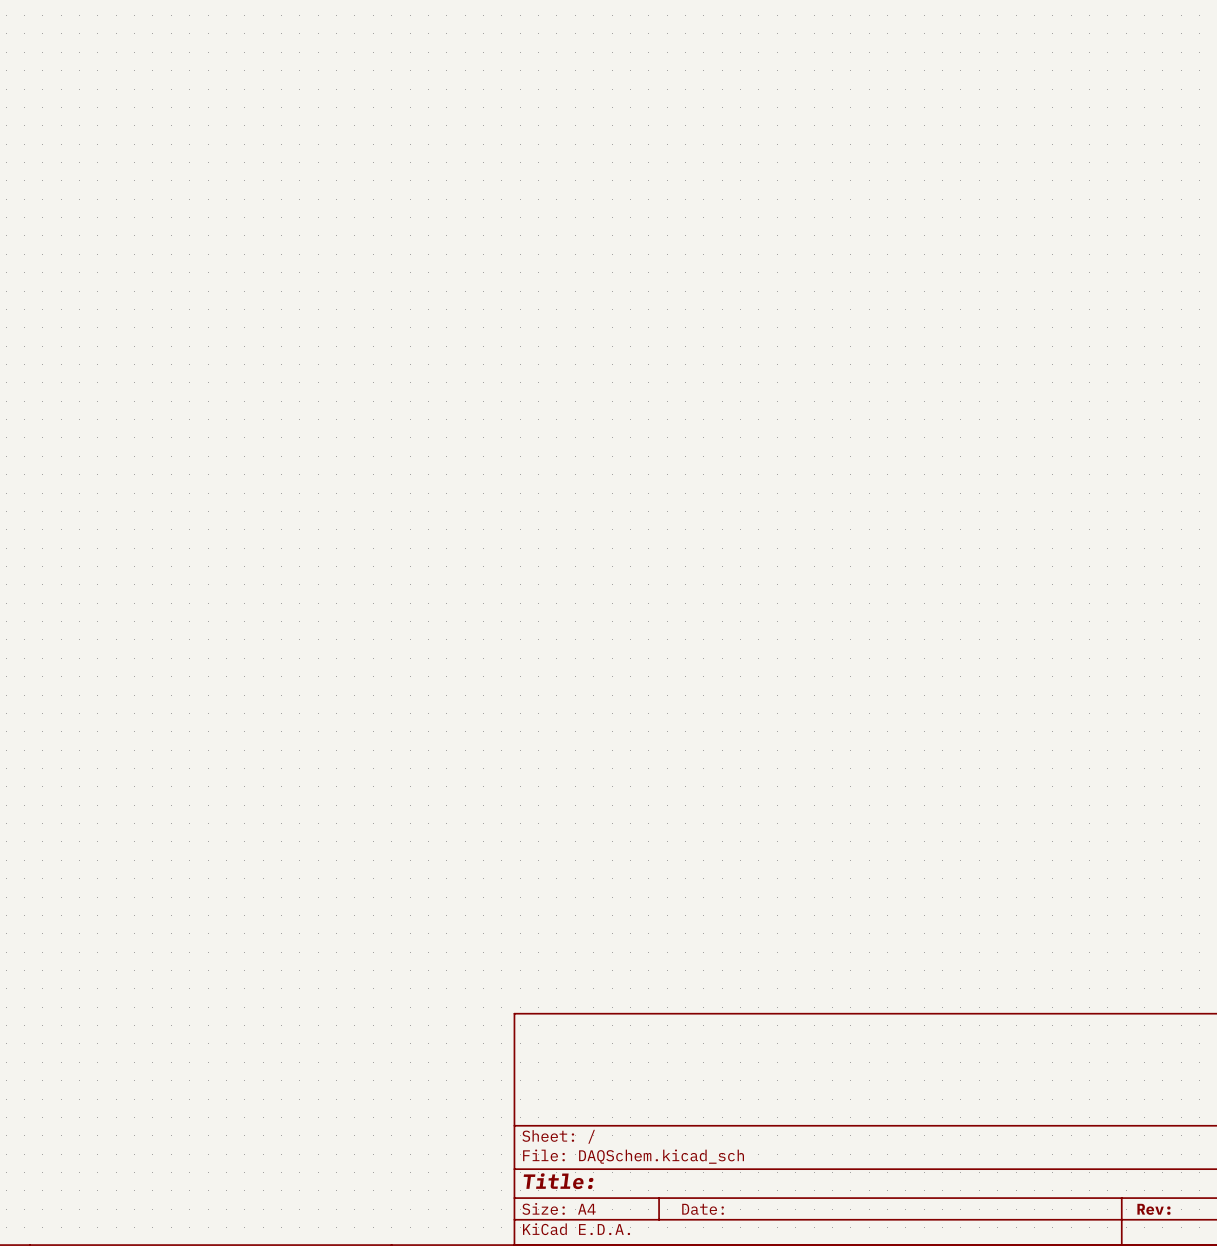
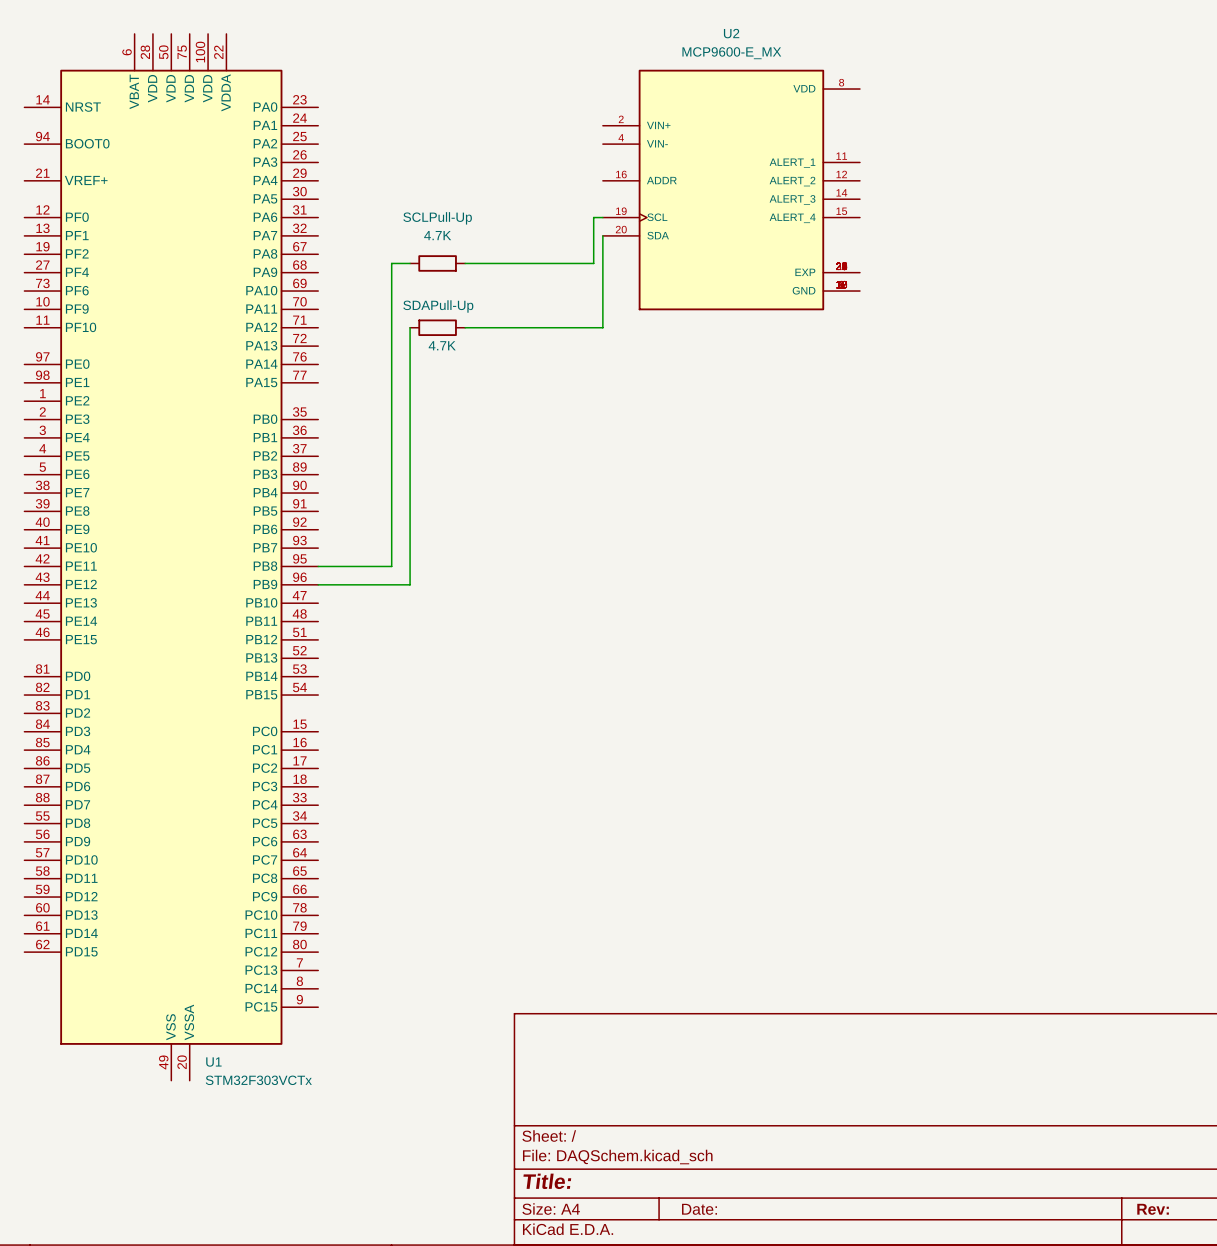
U2: none -> MCP9600-E_MX (731, 190)
wire: none -> (602, 217) (593, 217) (593, 263) (465, 263)
wire: none -> (602, 235) (602, 327) (465, 327)
wire: none -> (410, 263) (391, 263) (391, 566) (318, 566)
SCLPull-Up: none -> 4.7K (437, 263)
wire: none -> (410, 327) (410, 584) (318, 584)
SDAPull-Up: none -> 4.7K (437, 327)
U1: none -> STM32F303VCTx (171, 557)

